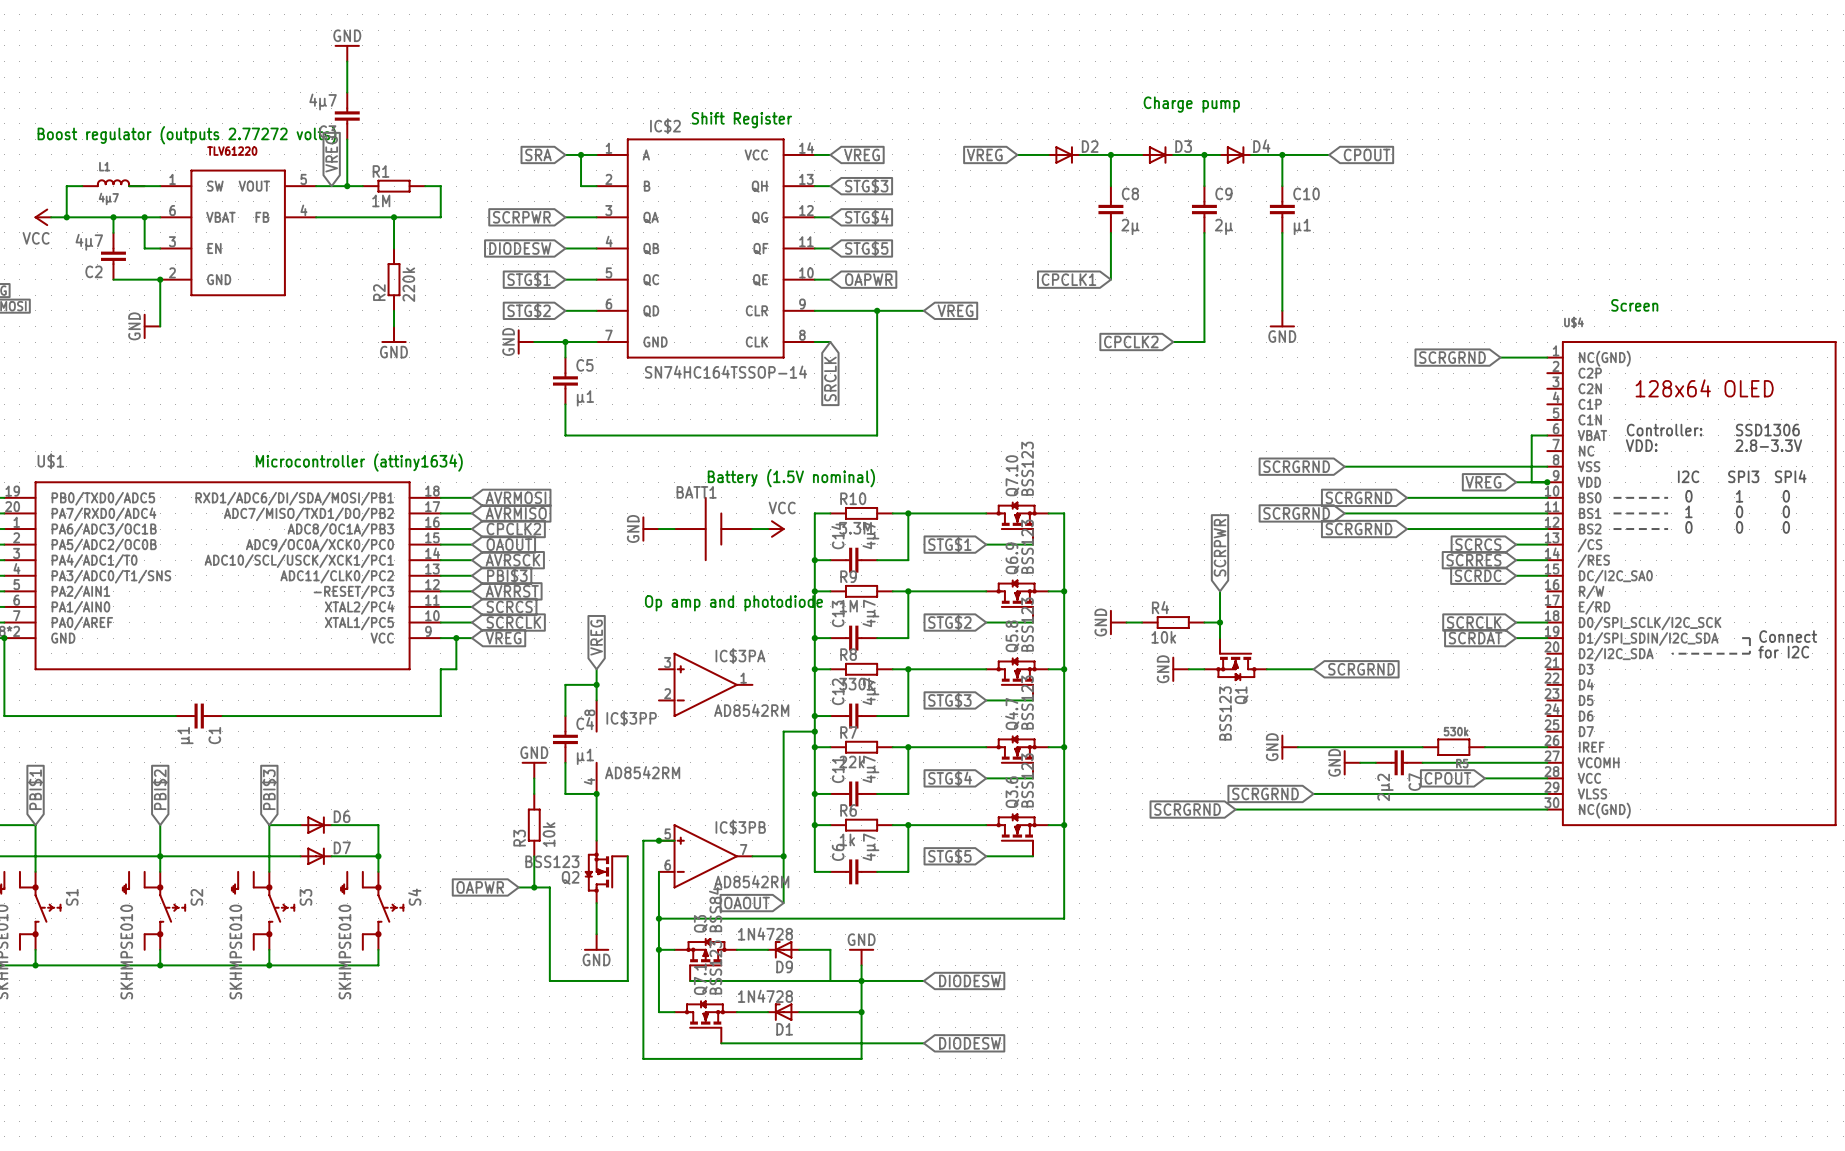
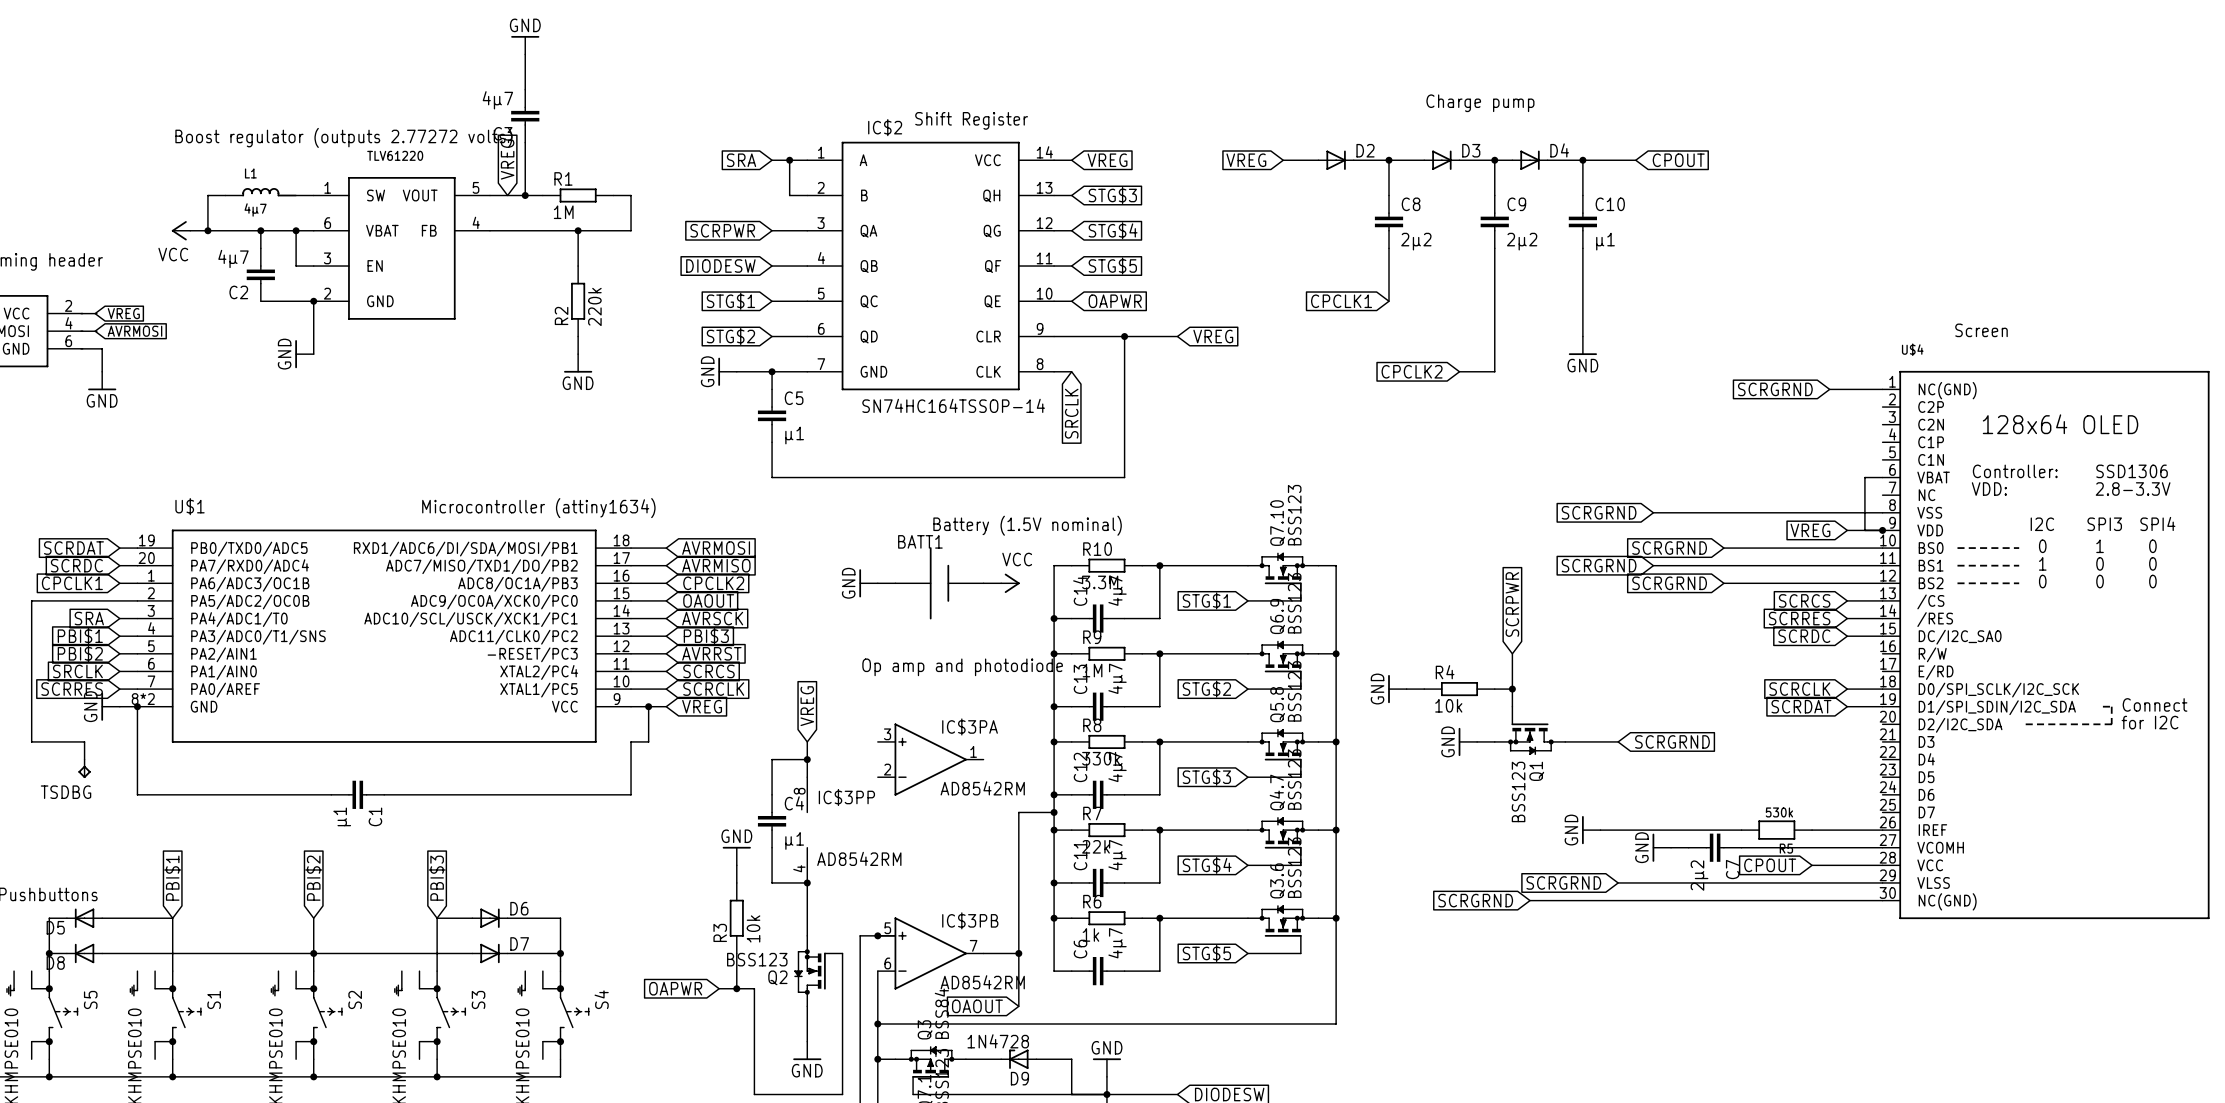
C8 value: 2µ (1130, 226) -> 2µ2 (1416, 241)
C9 value: 2µ (1223, 226) -> 2µ2 (1522, 241)

